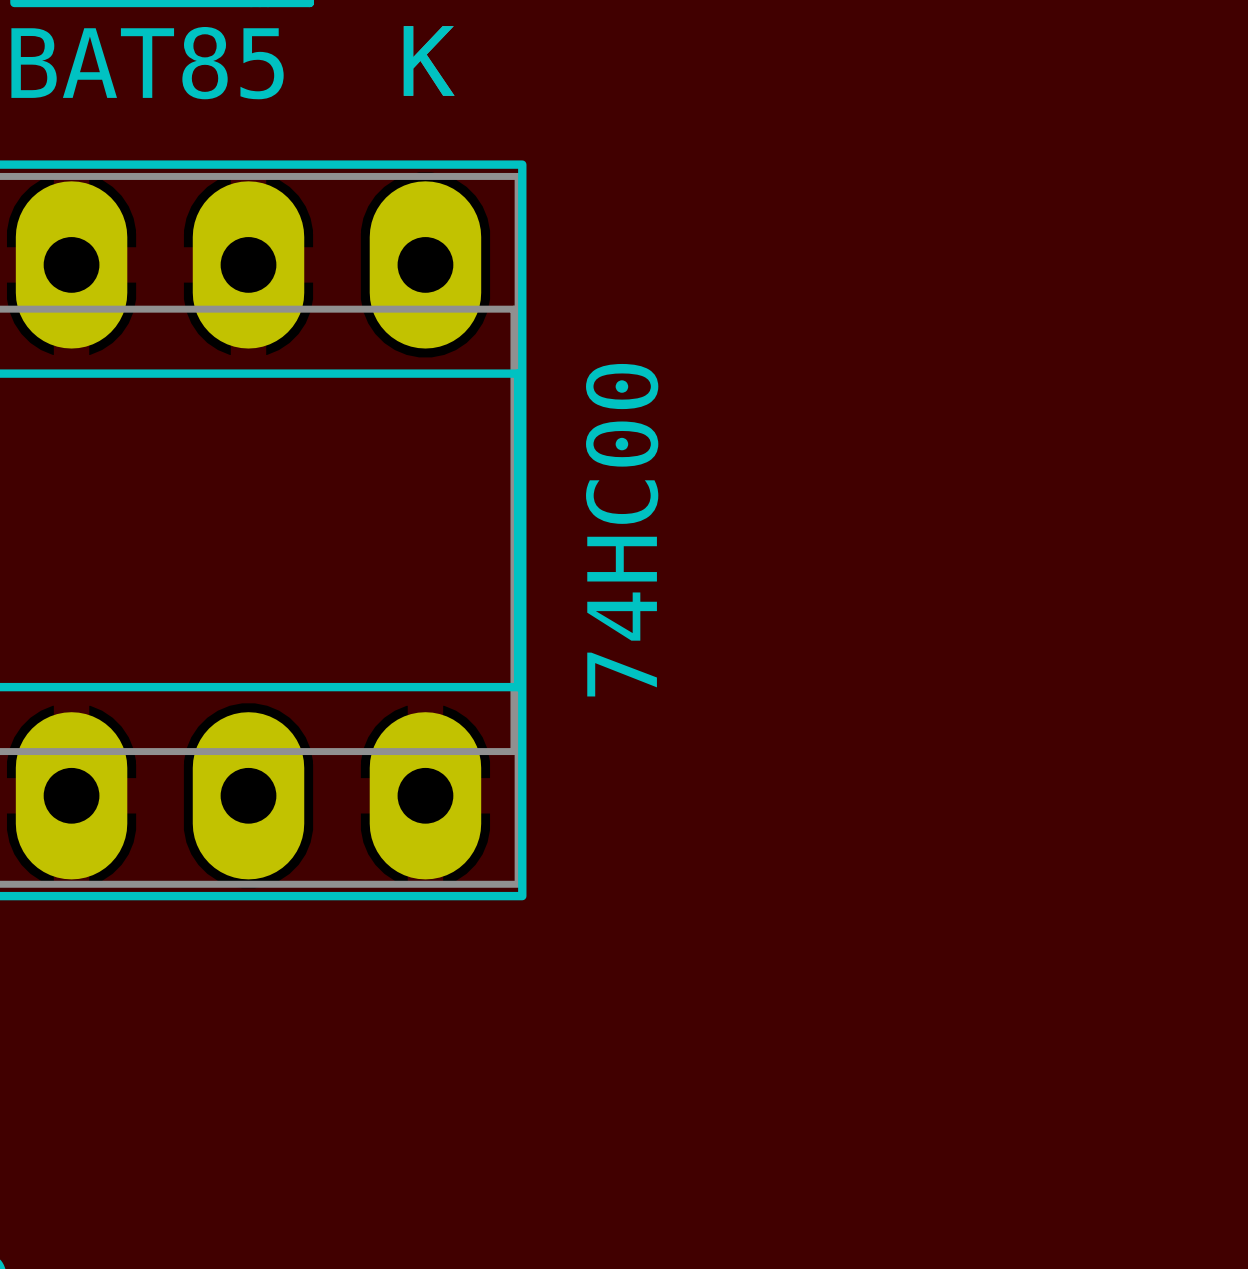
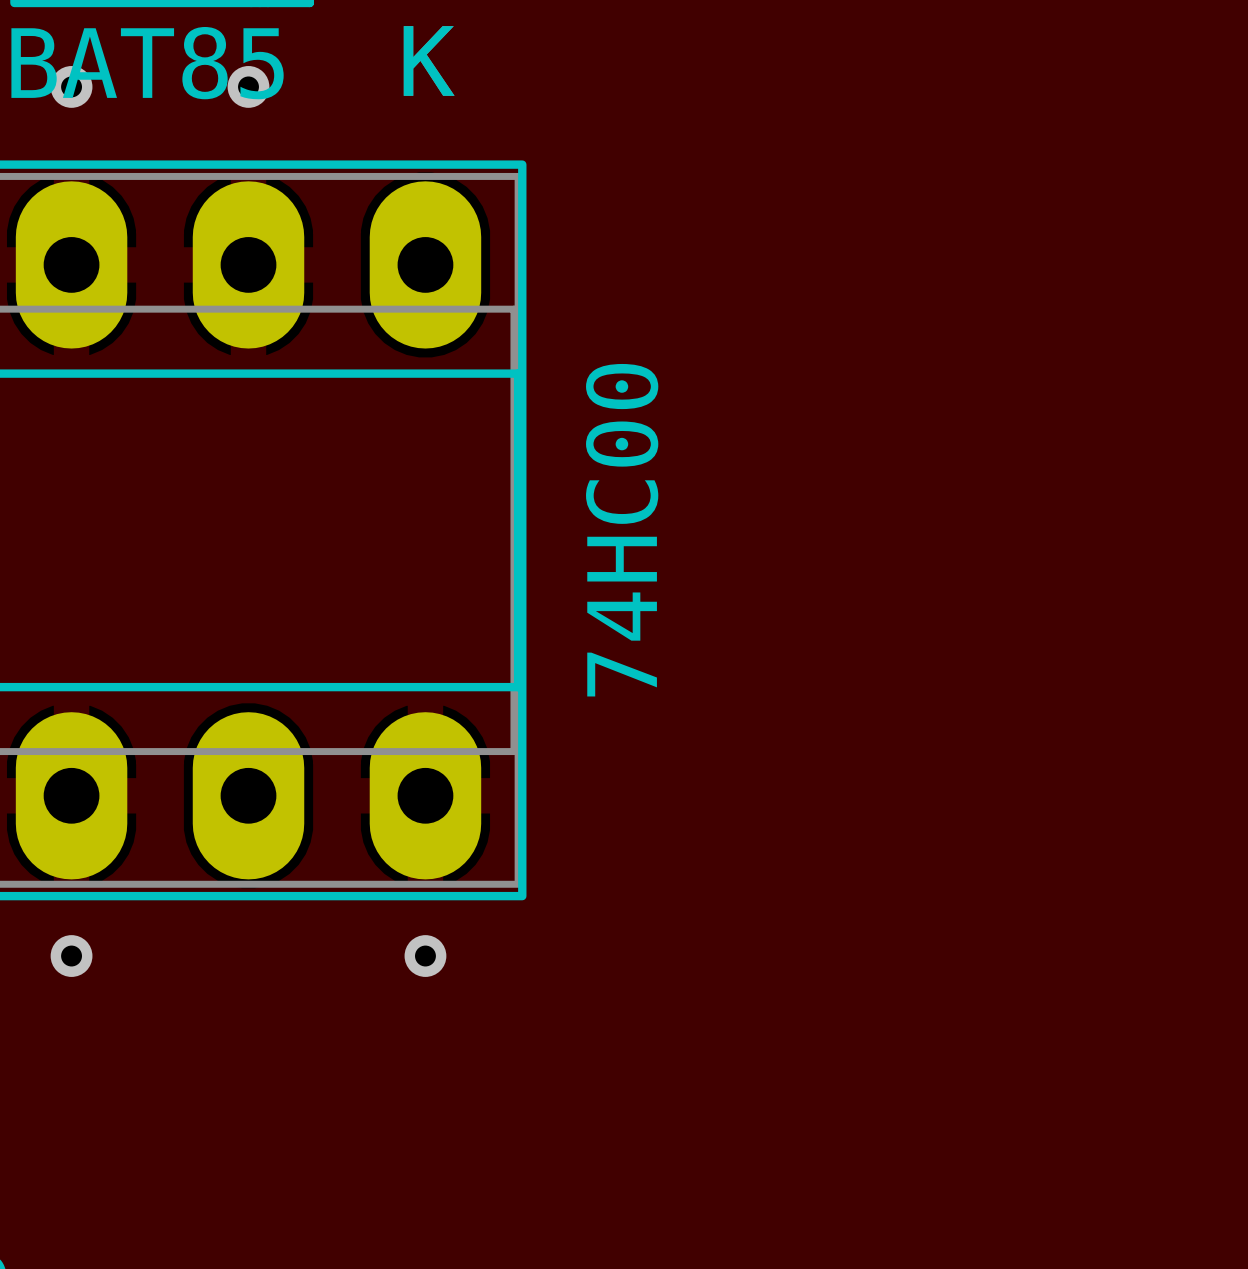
via: none -> (71, 86)
via: none -> (248, 86)
via: none -> (71, 956)
via: none -> (425, 956)

